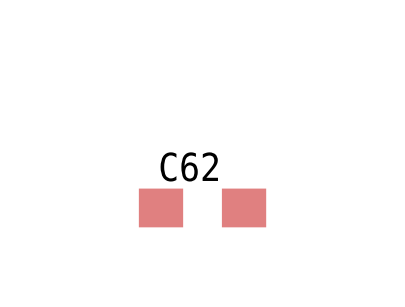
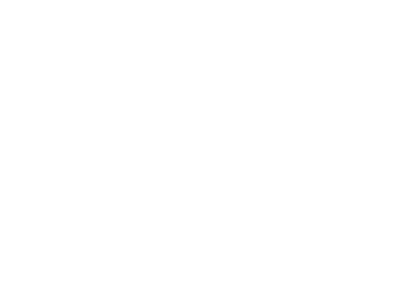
C62: (202, 207) -> none

